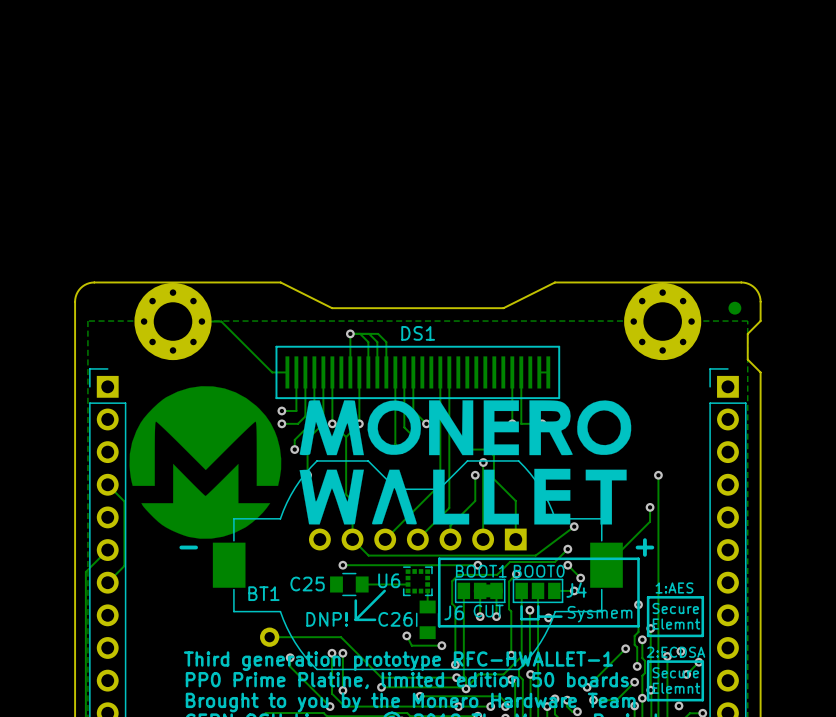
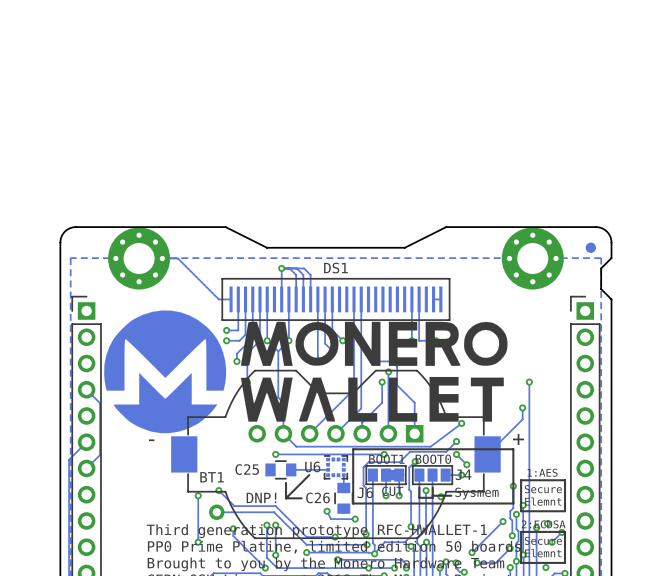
track: none -> (218, 490) (234, 506) (275, 506) (306, 537) (335, 537)
via: none -> (218, 490)
track: none -> (198, 495) (198, 542)
via: none -> (198, 495)
via: none -> (335, 537)
via: none -> (198, 542)

